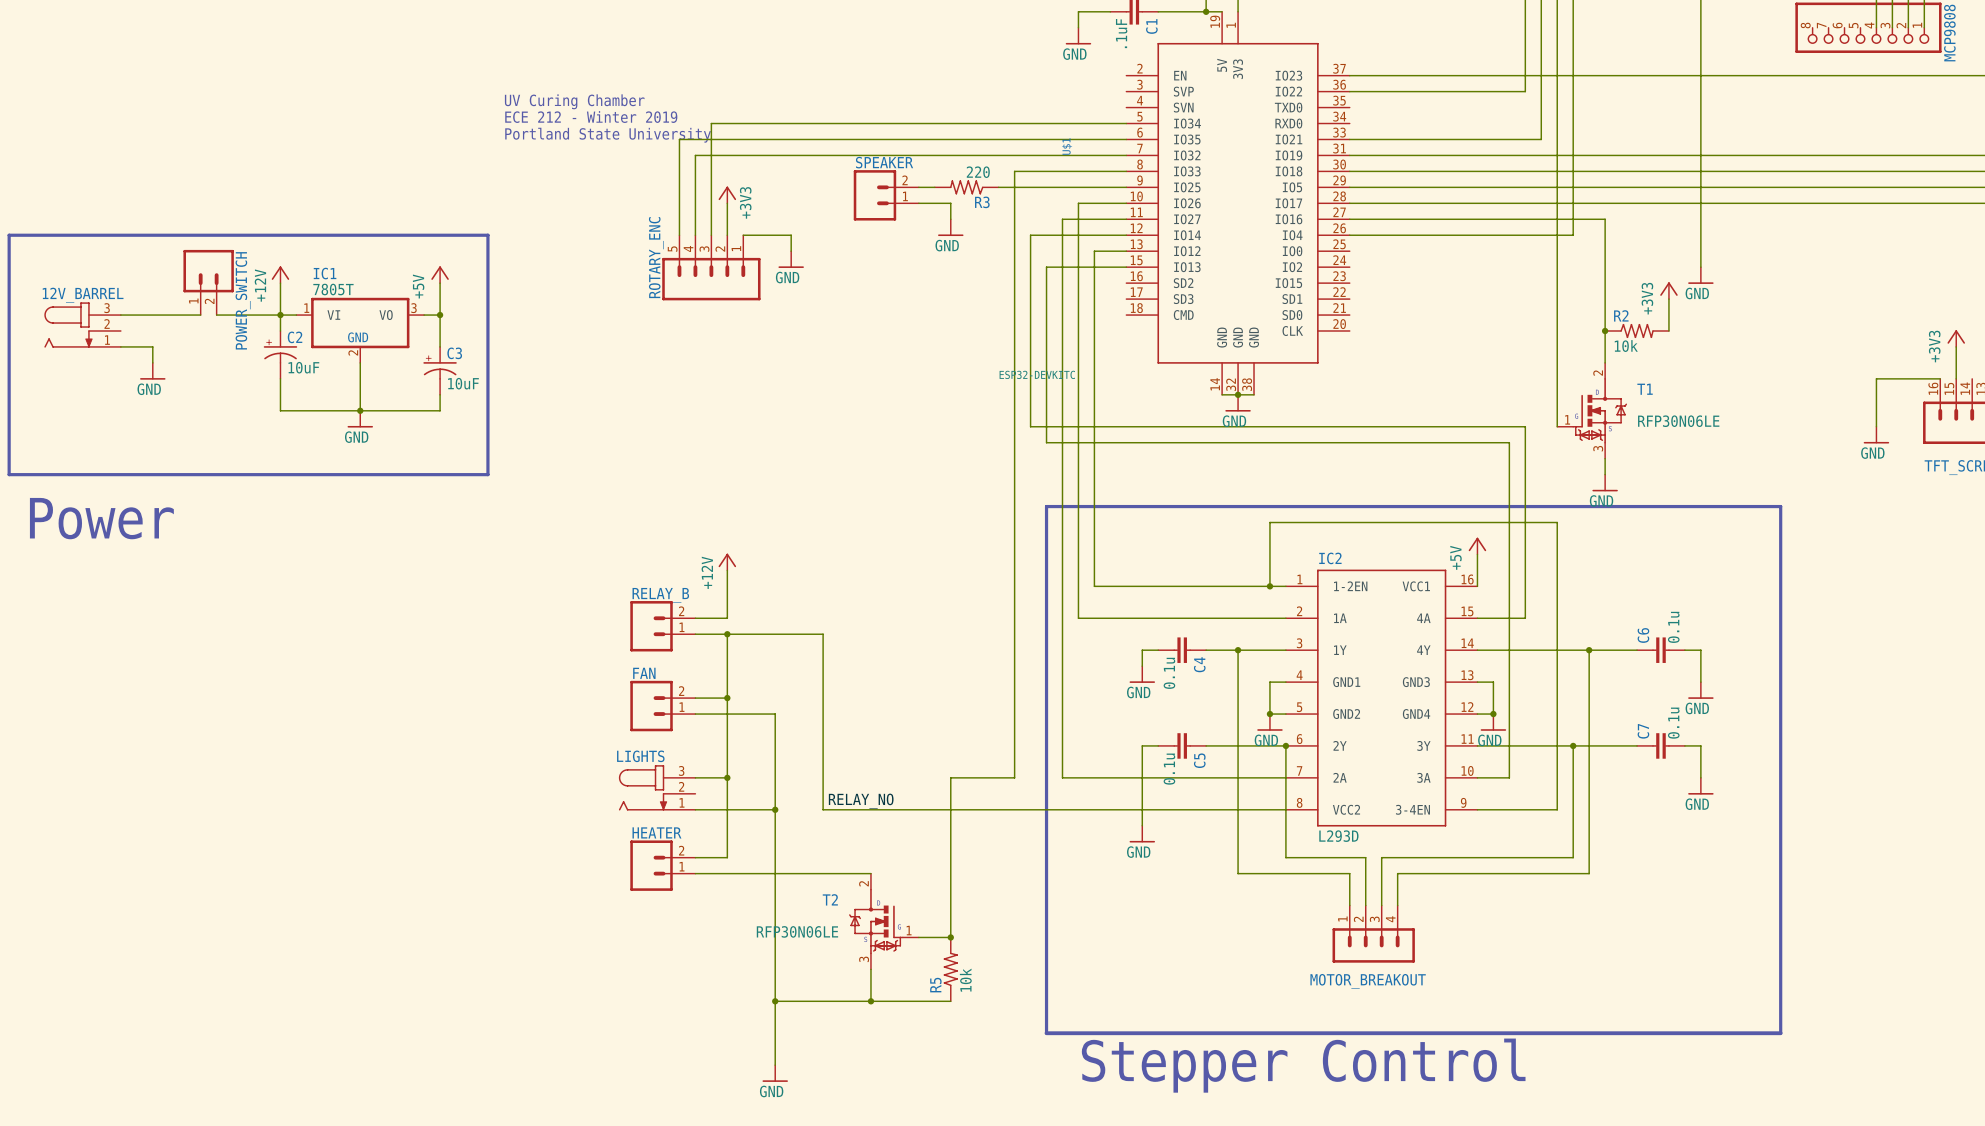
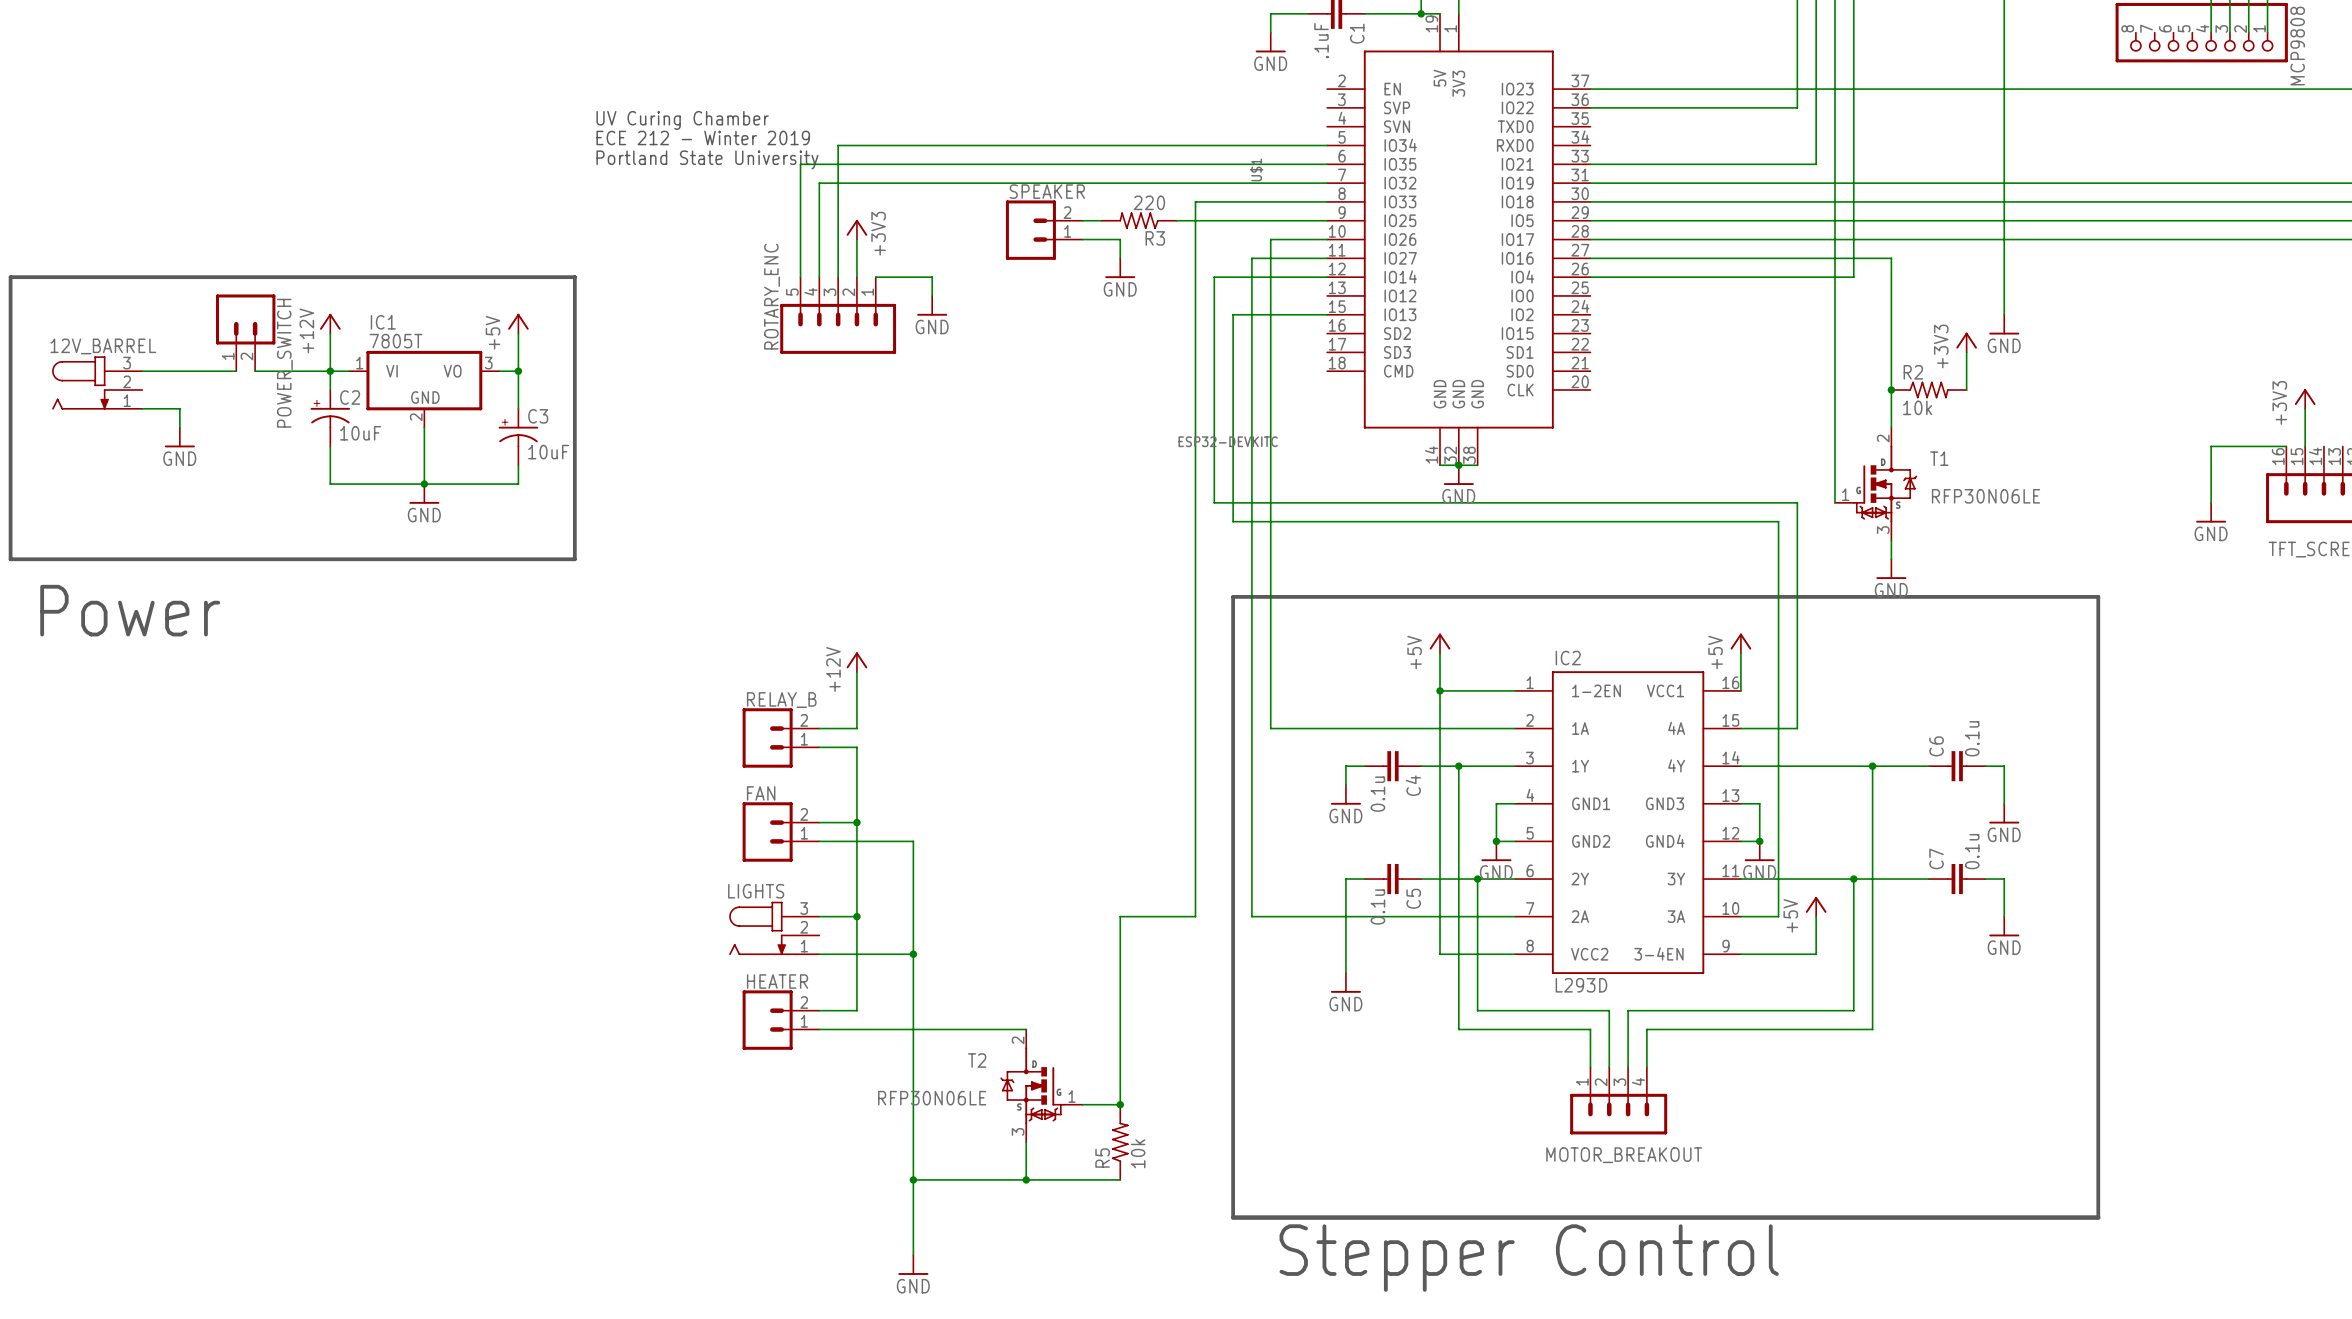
wire: (1126, 251) (1094, 251) (1094, 586) (1222, 586) -> none
power symbol: none -> +5V (1440, 643)
junction: none -> (1440, 690)
wire: (1269, 586) (1269, 522) (1557, 522) (1557, 809) (1541, 809) -> (1816, 916) (1816, 954)
junction: (1269, 586) -> none
wire: (727, 634) (823, 634) (823, 809) (1222, 809) -> (1440, 653) (1440, 954)
junction: (727, 634) -> none
wire: (1285, 745) (1285, 857) -> (1477, 879) (1477, 1010) (1515, 1010)
junction position: (1285, 745) -> (1477, 879)
power symbol: none -> +5V (1816, 906)
label: RELAY_NO (861, 801) -> none

